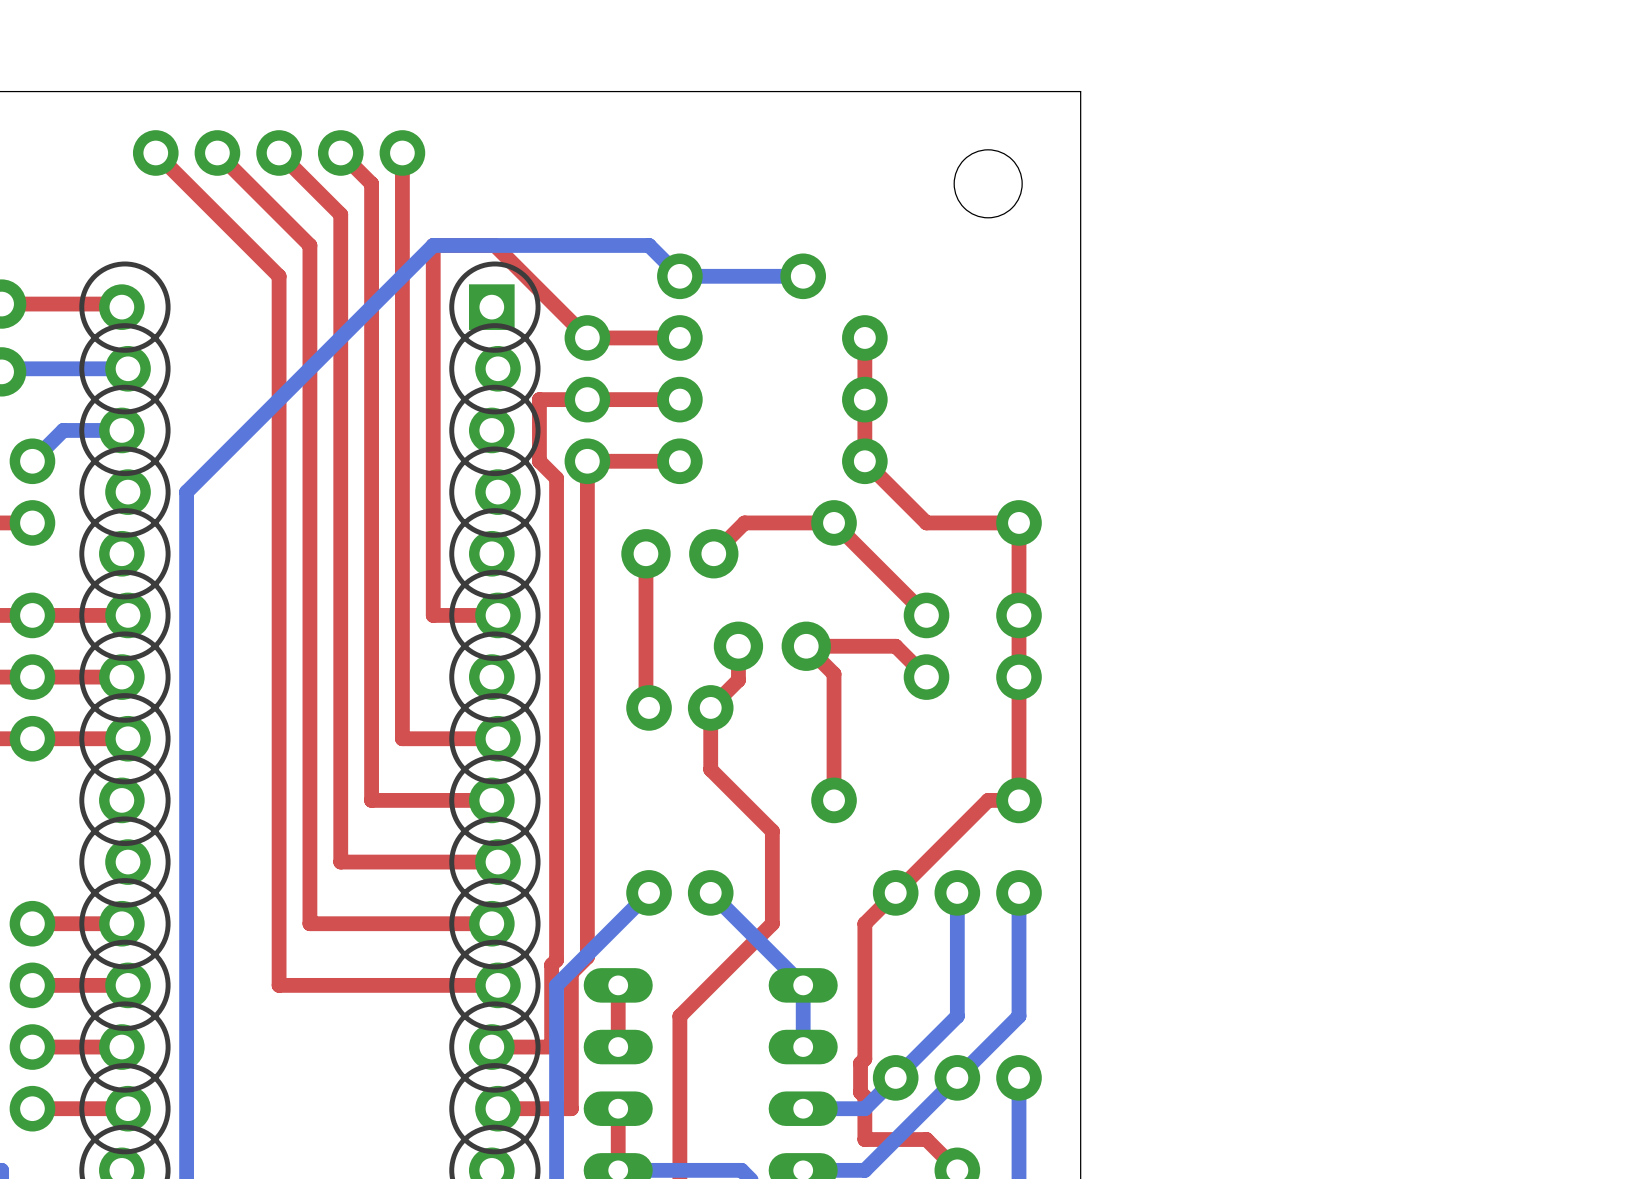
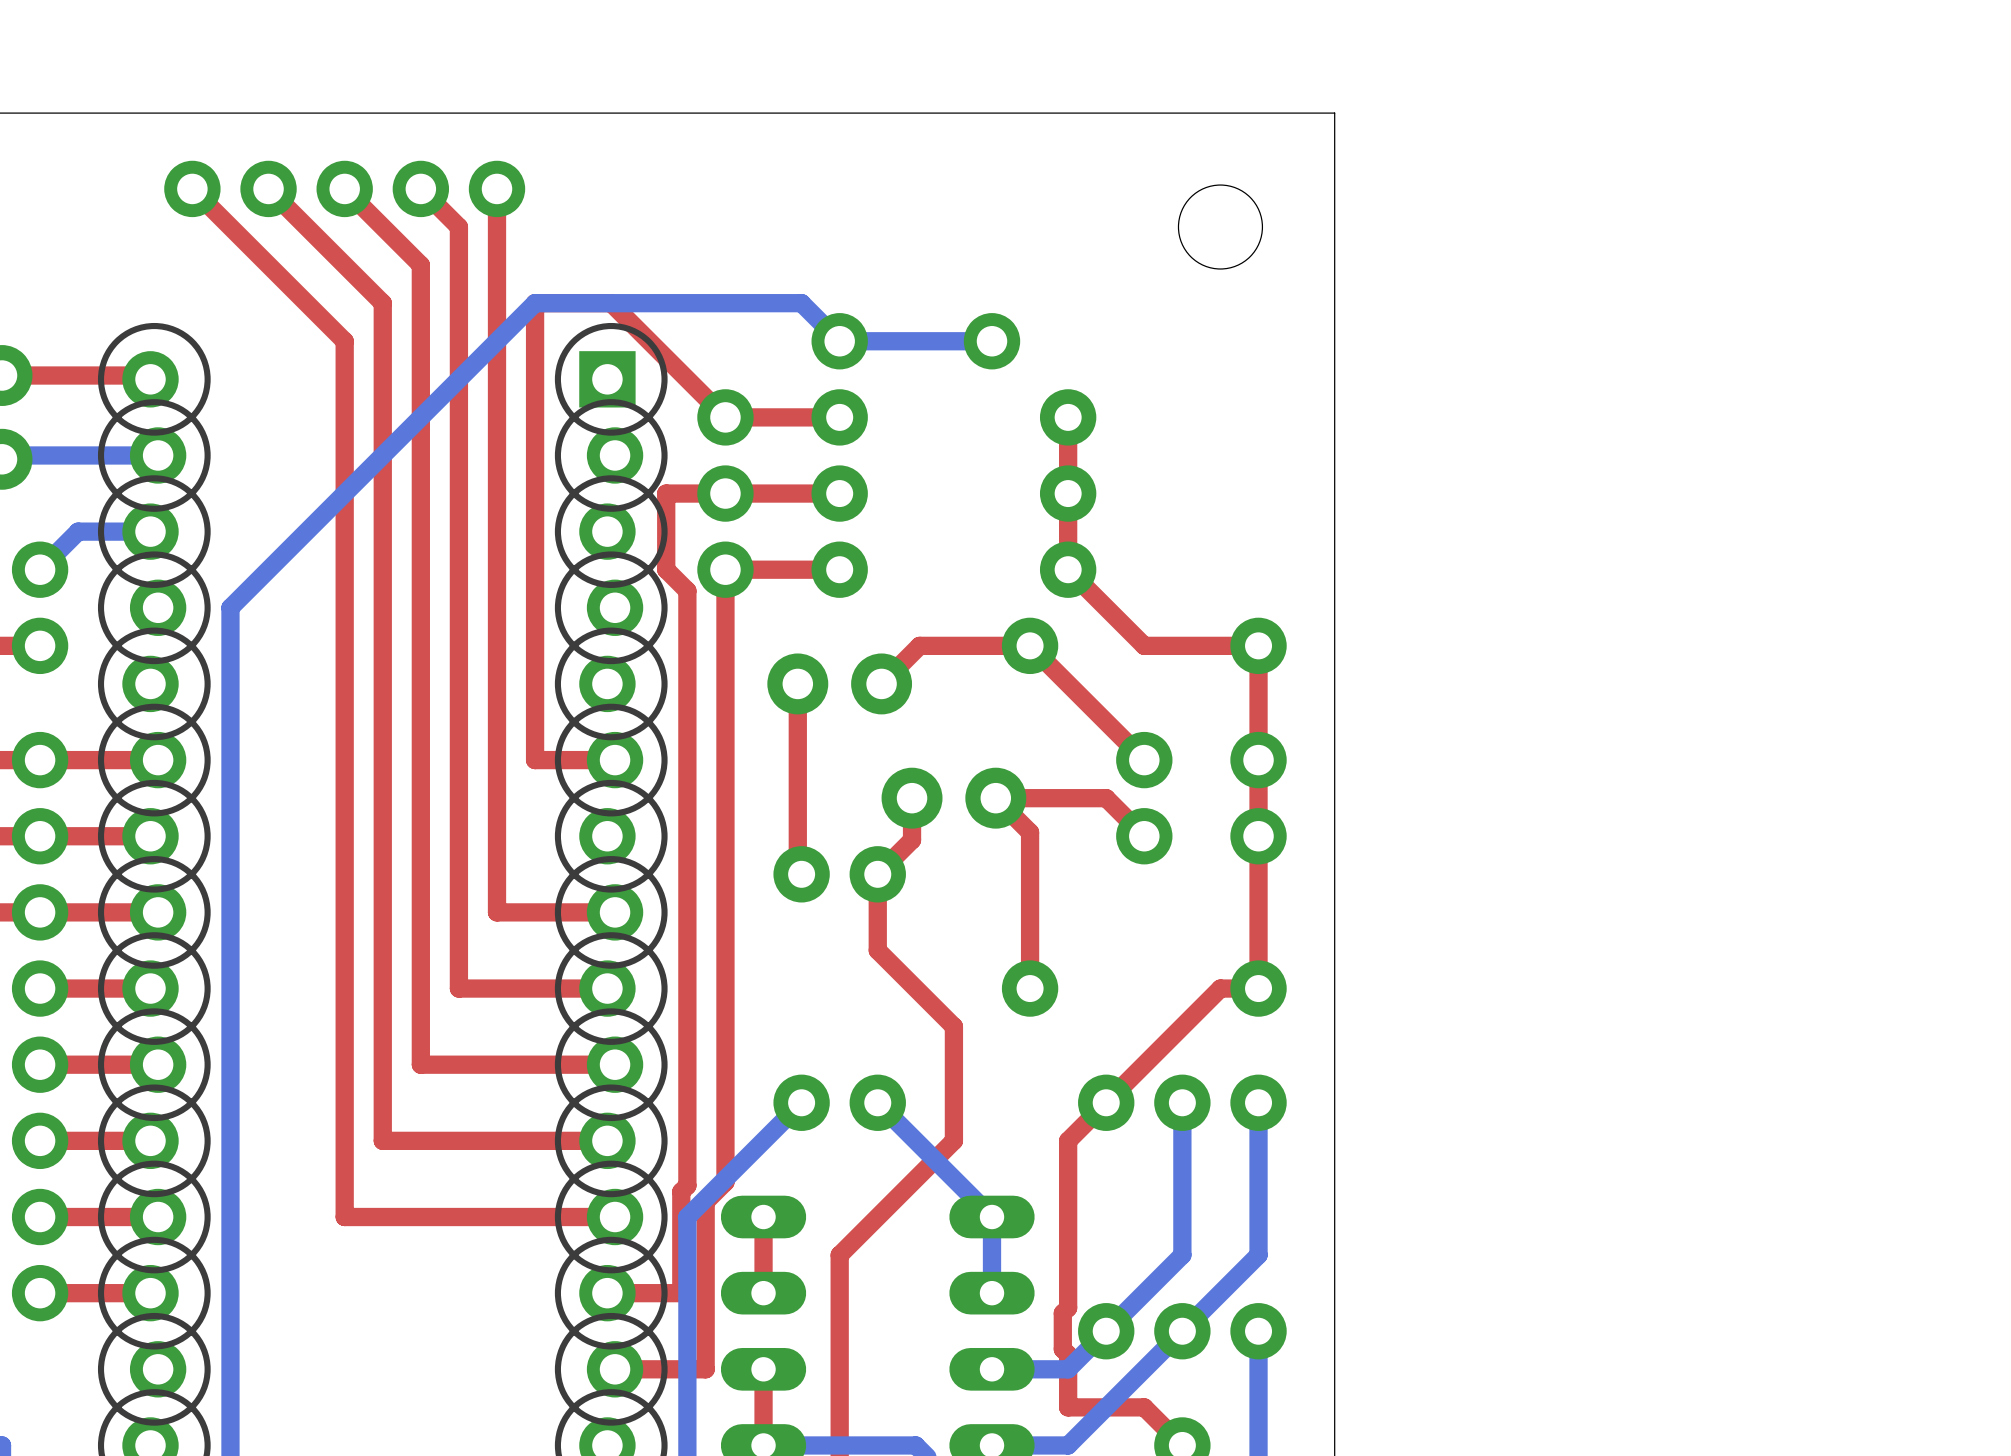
top track: none -> (150, 988) (40, 988)
part: none -> (40, 1140)
part: (32, 1016) -> none
top track: (128, 1108) (32, 1108) -> (158, 1064) (40, 1064)

